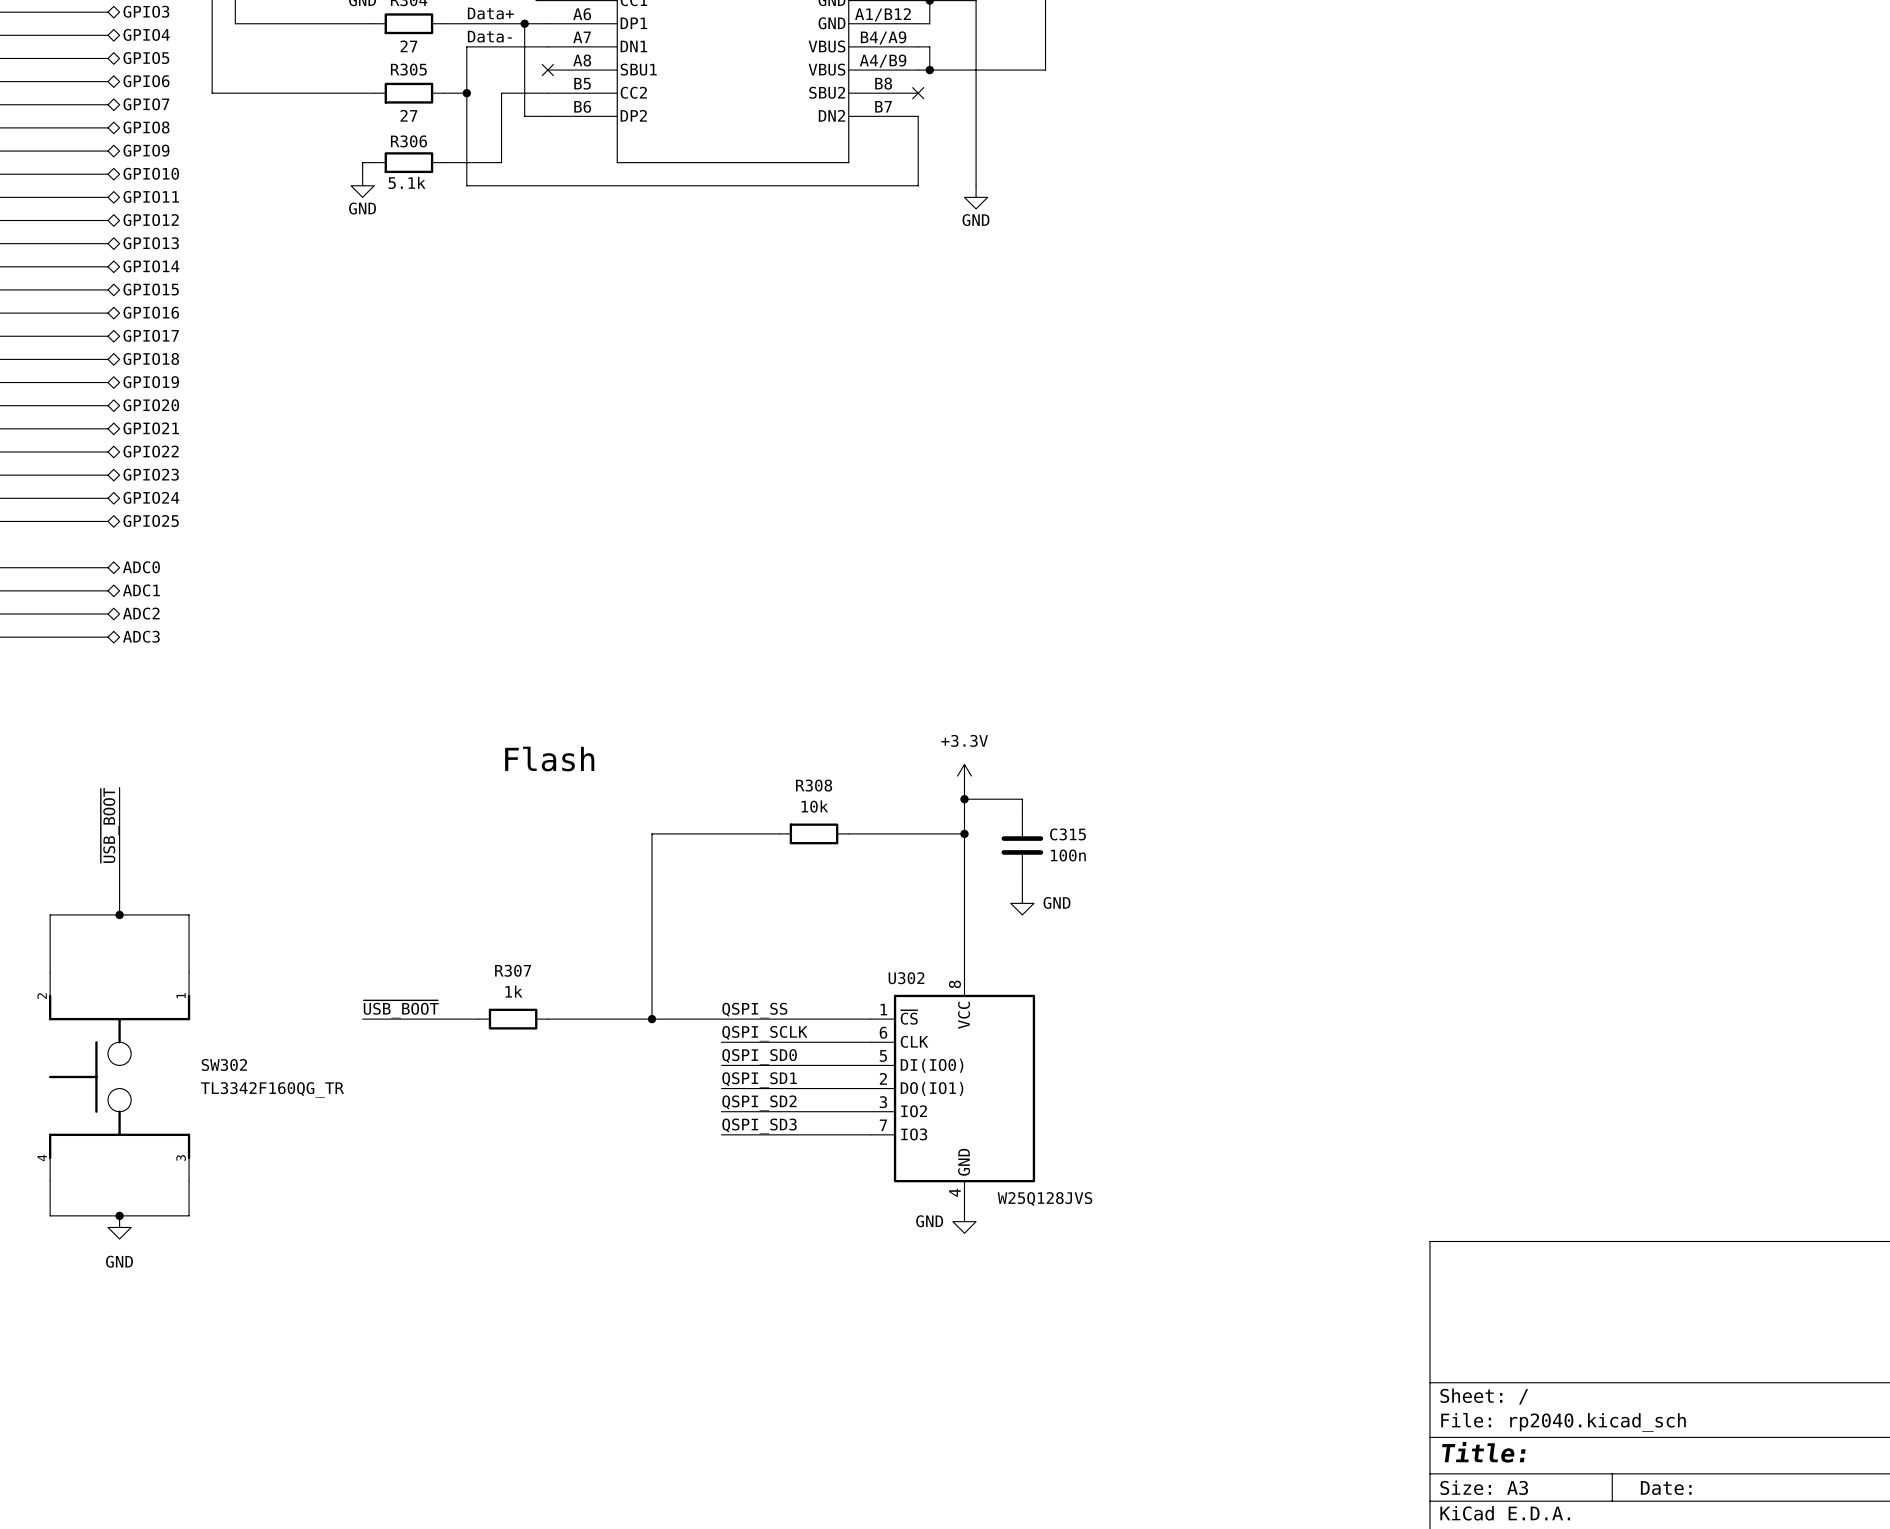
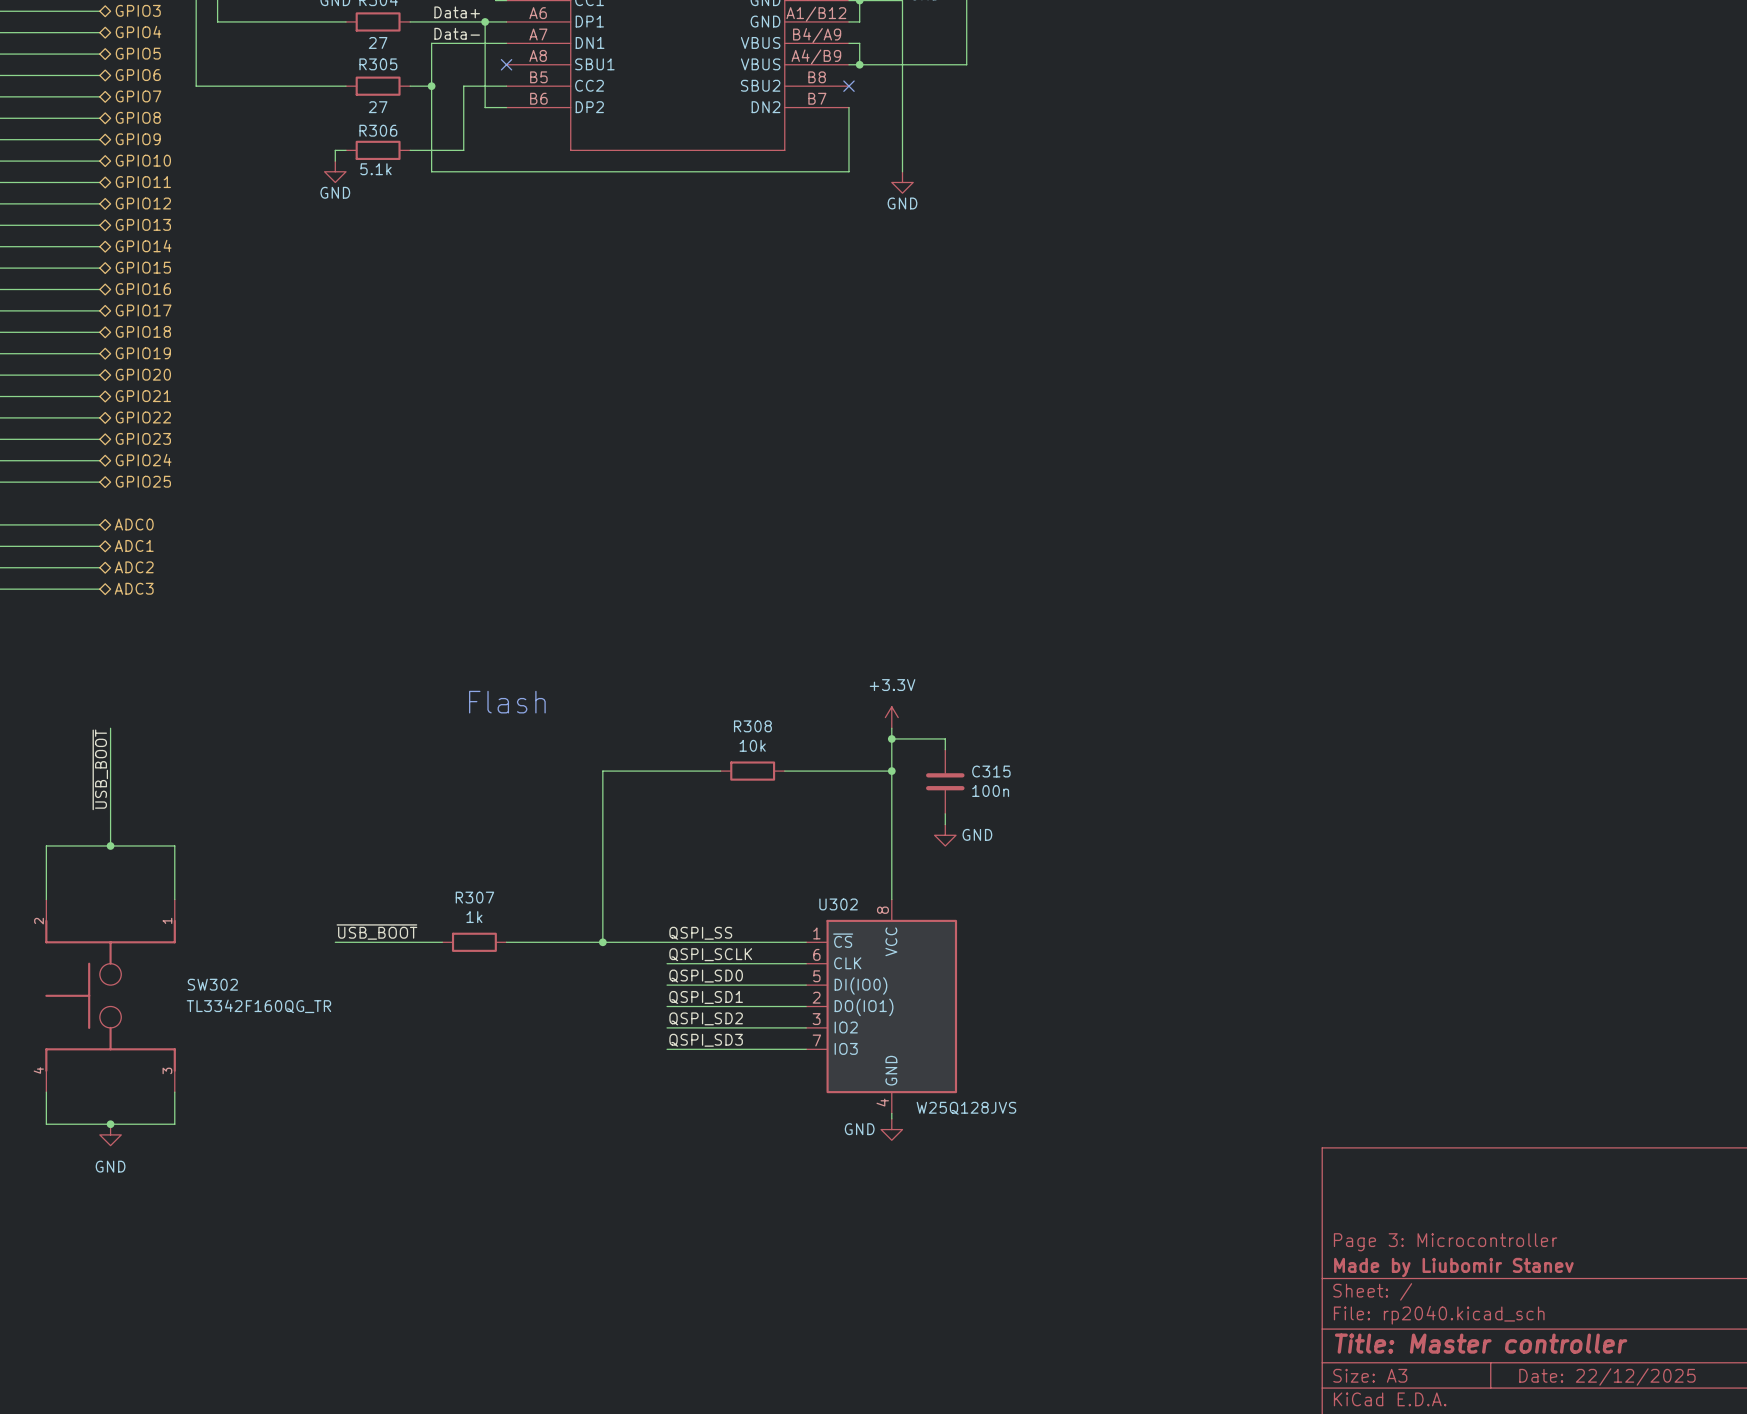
title block: none -> Page 3: Microcontroller (1445, 1242)
title block: none -> Made by Liubomir Stanev (1453, 1267)
title block: Title: (1483, 1452) -> Title: Master controller (1481, 1343)
title block: Date: (1666, 1488) -> Date: 22/12/2025 (1607, 1376)

